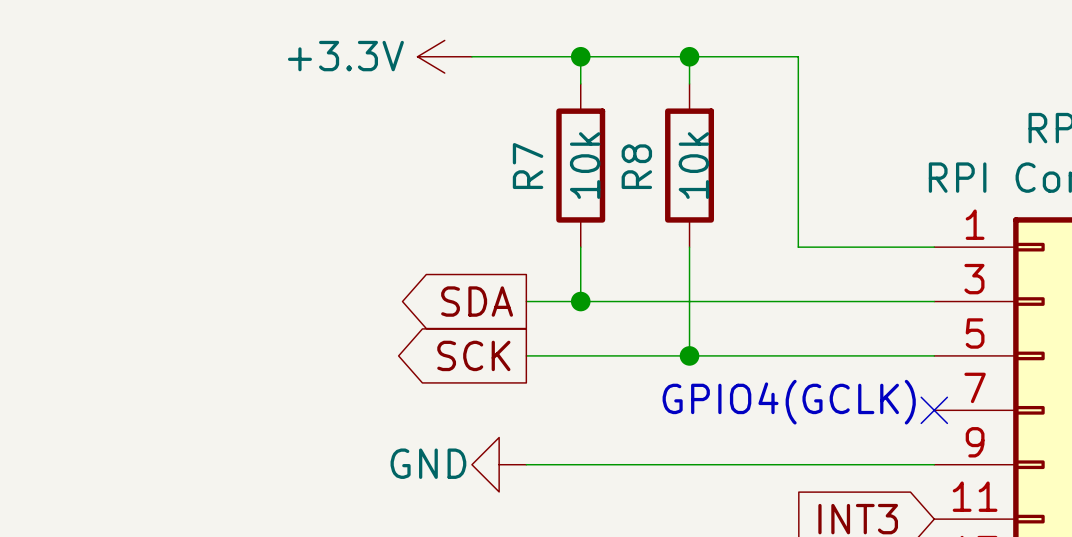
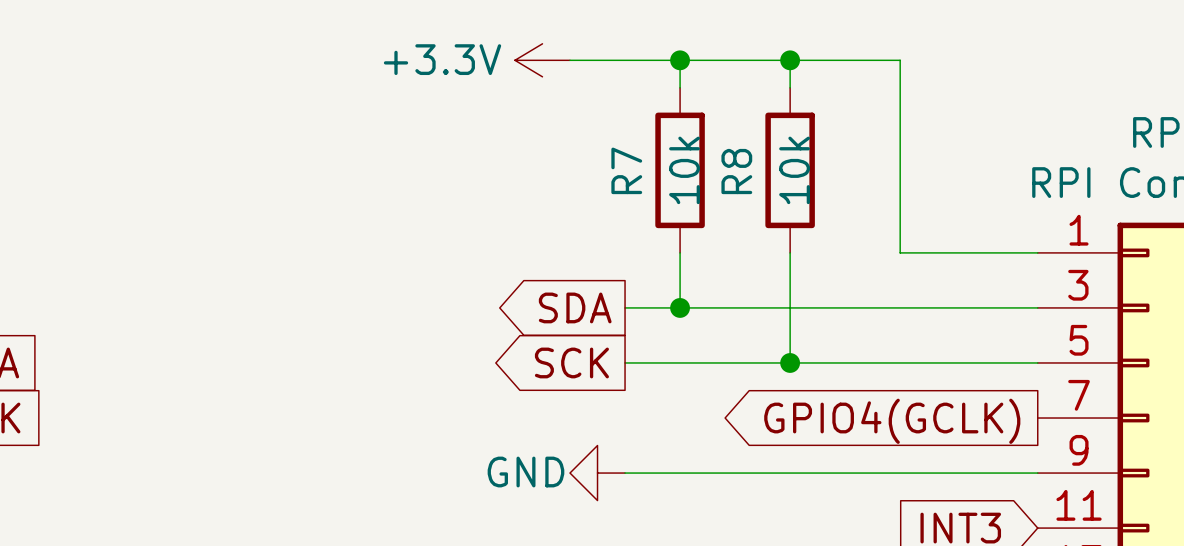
text: GPIO4(GCLK) (789, 402) -> none
no-connect mark: (934, 410) -> none
global label: none -> GPIO4(GCLK) (892, 421)

